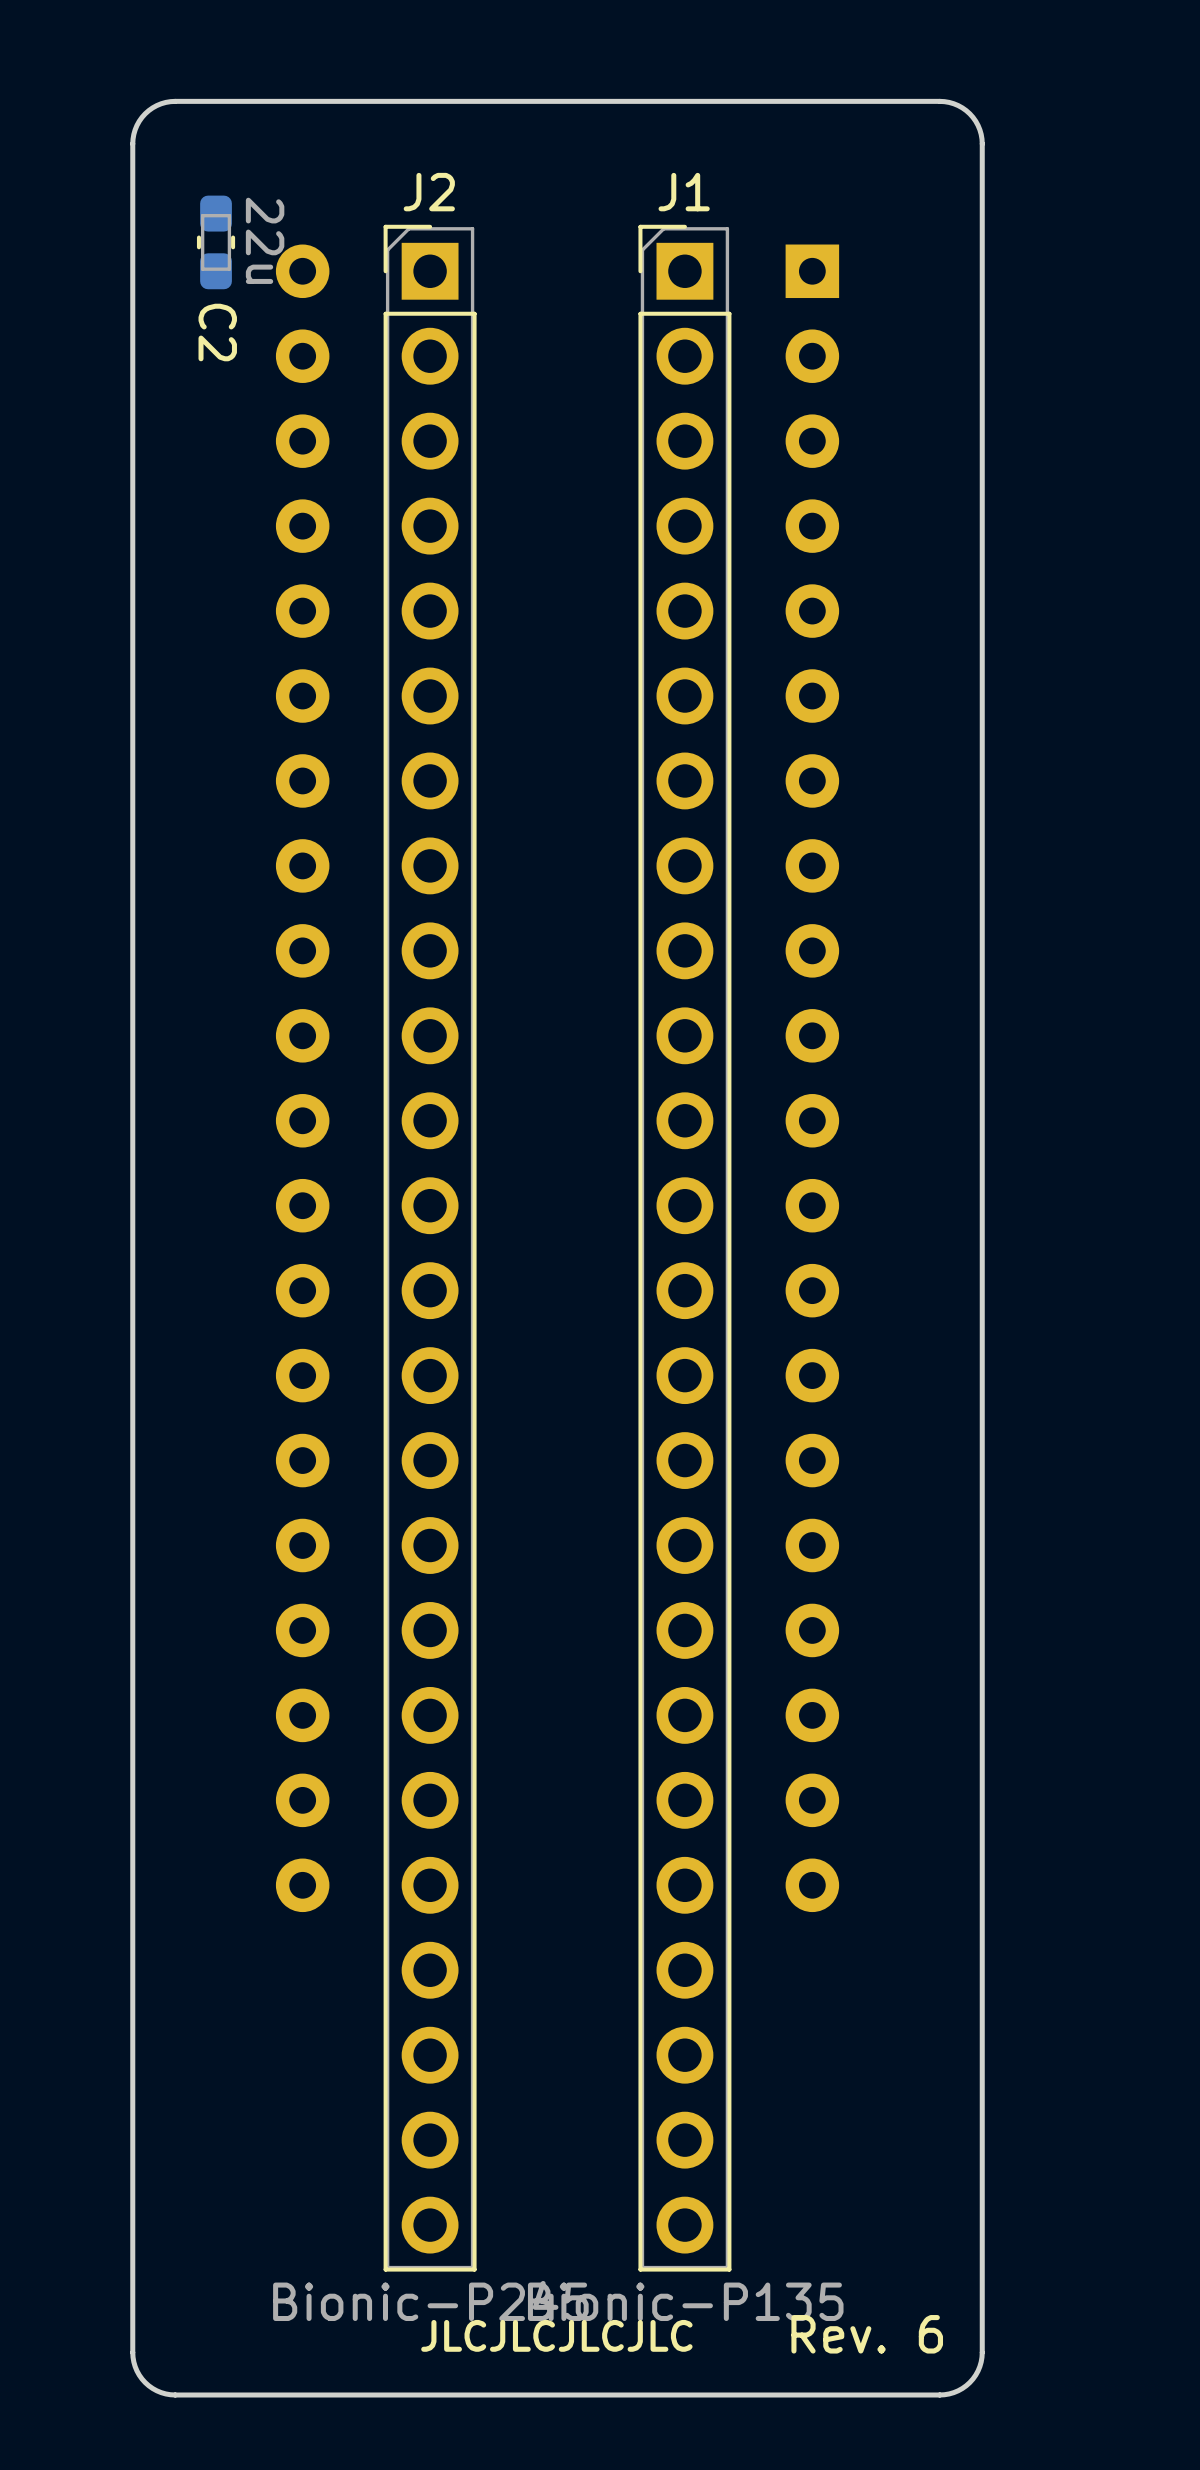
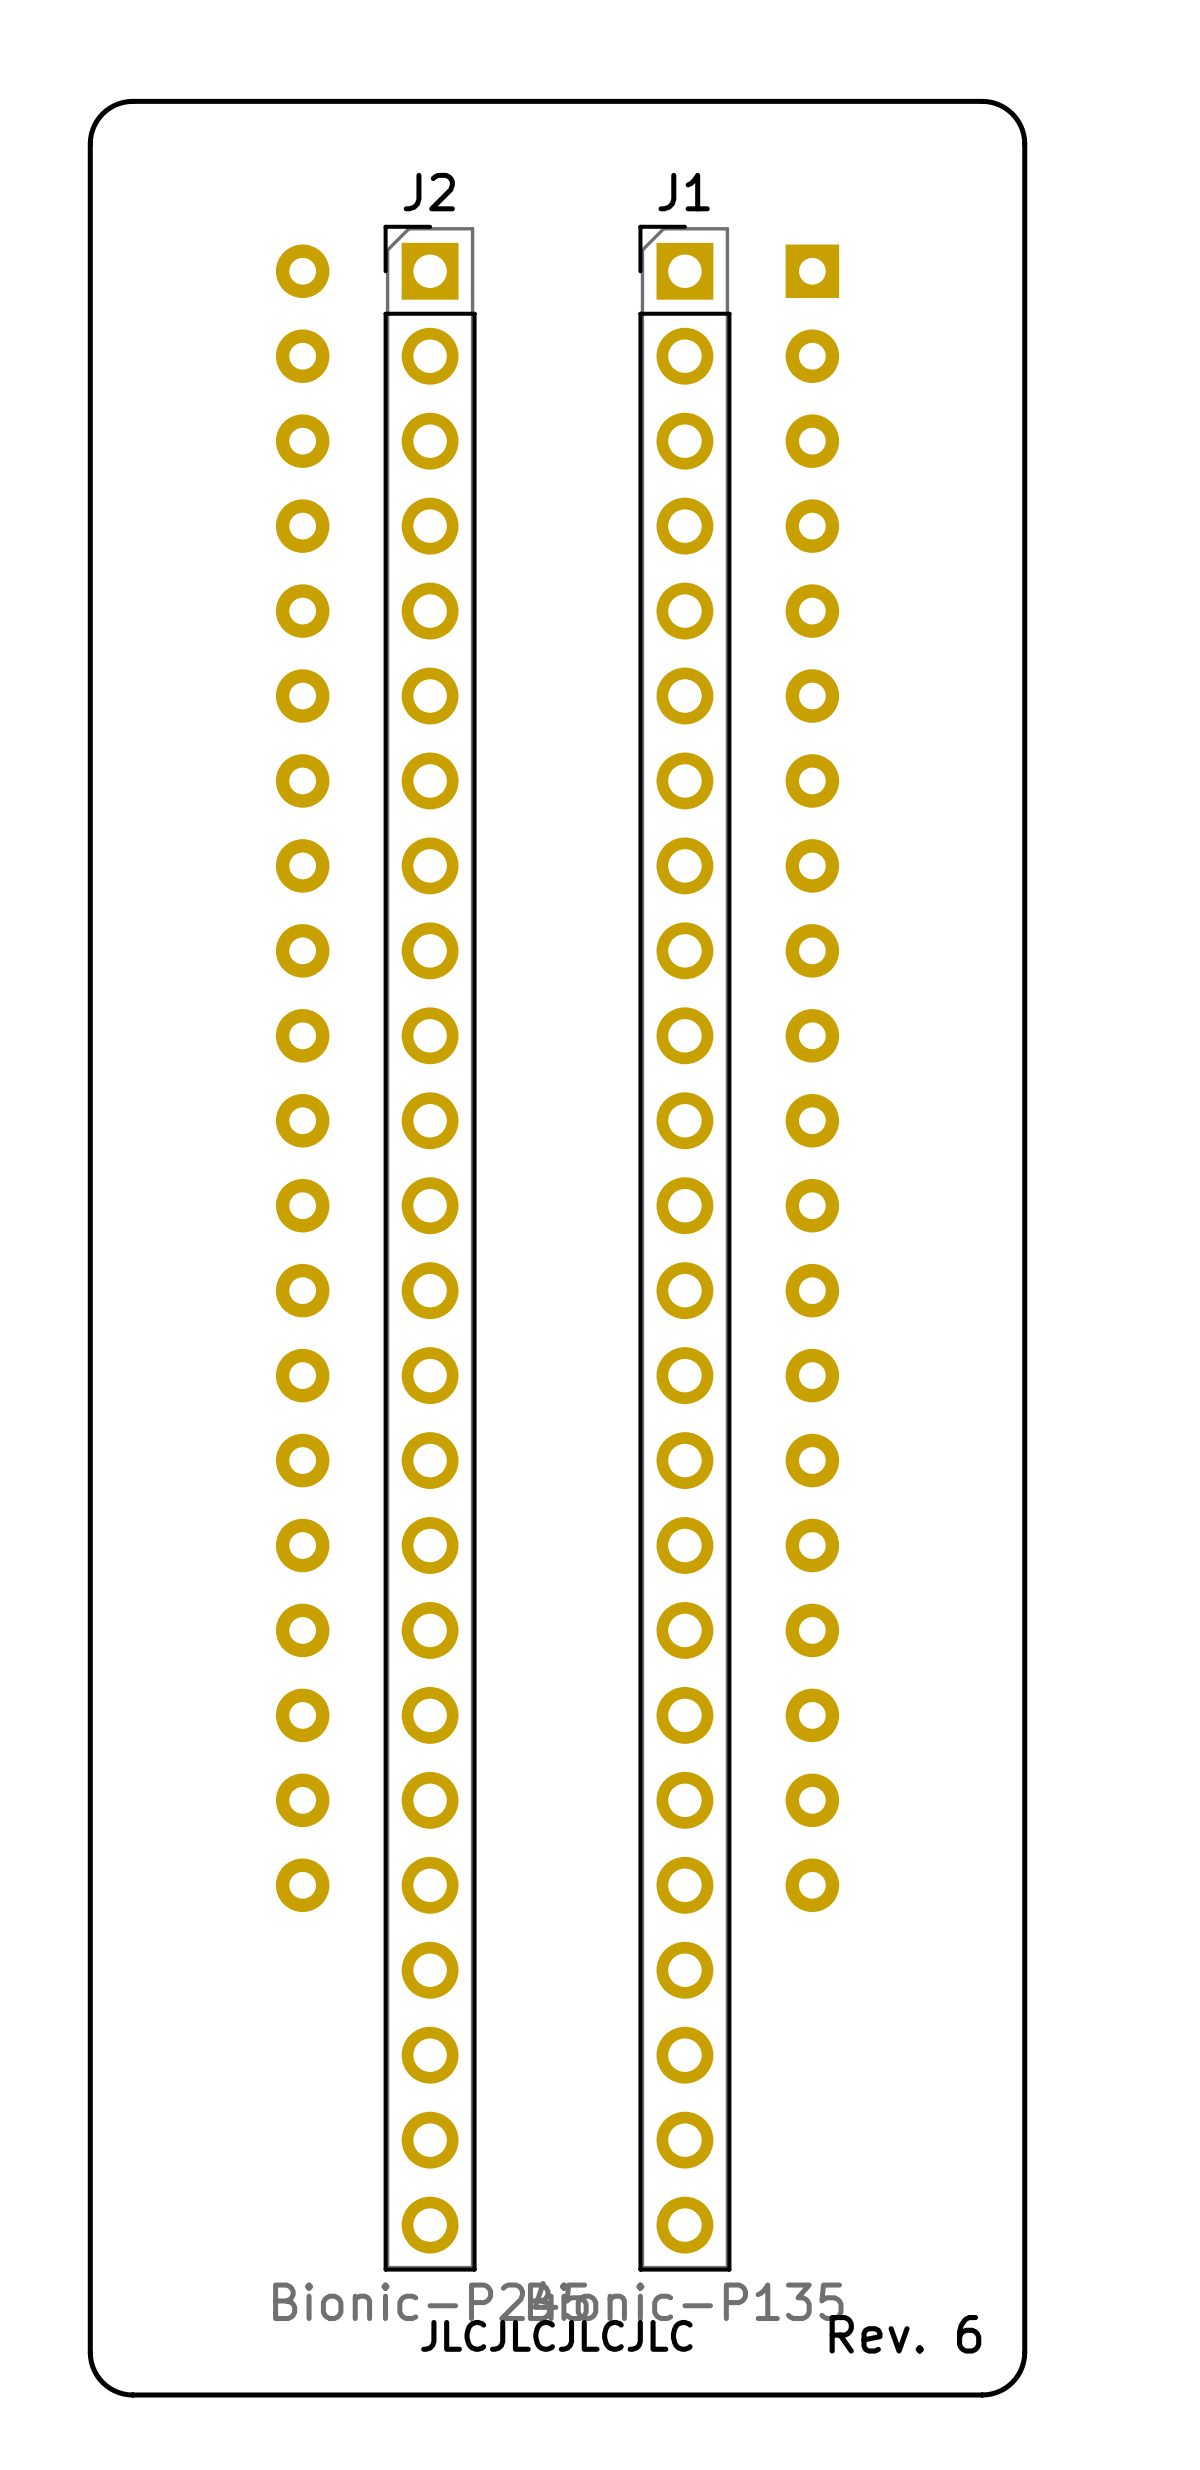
board edge: (175, 101) (161, 103) (145, 113) (135, 129) (132, 143) (132, 2352) (135, 2366) (145, 2382) (161, 2392) (175, 2395) -> (175, 101) (128, 101) (114, 105) (106, 110) (96, 121) (91, 134) (90, 143) (90, 2352) (91, 2361) (96, 2375) (106, 2385) (114, 2390) (128, 2394) (175, 2395)
board edge: (939, 101) (953, 103) (969, 113) (979, 129) (982, 143) (982, 2352) (979, 2366) (969, 2382) (953, 2392) (939, 2395) -> (939, 101) (987, 101) (1000, 105) (1008, 110) (1018, 121) (1023, 134) (1024, 143) (1024, 2352) (1023, 2361) (1018, 2375) (1008, 2385) (1000, 2390) (987, 2394) (939, 2395)
C2: 22u (216, 242) -> none
text position: Rev. 6 (867, 2334) -> Rev. 6 (905, 2334)

